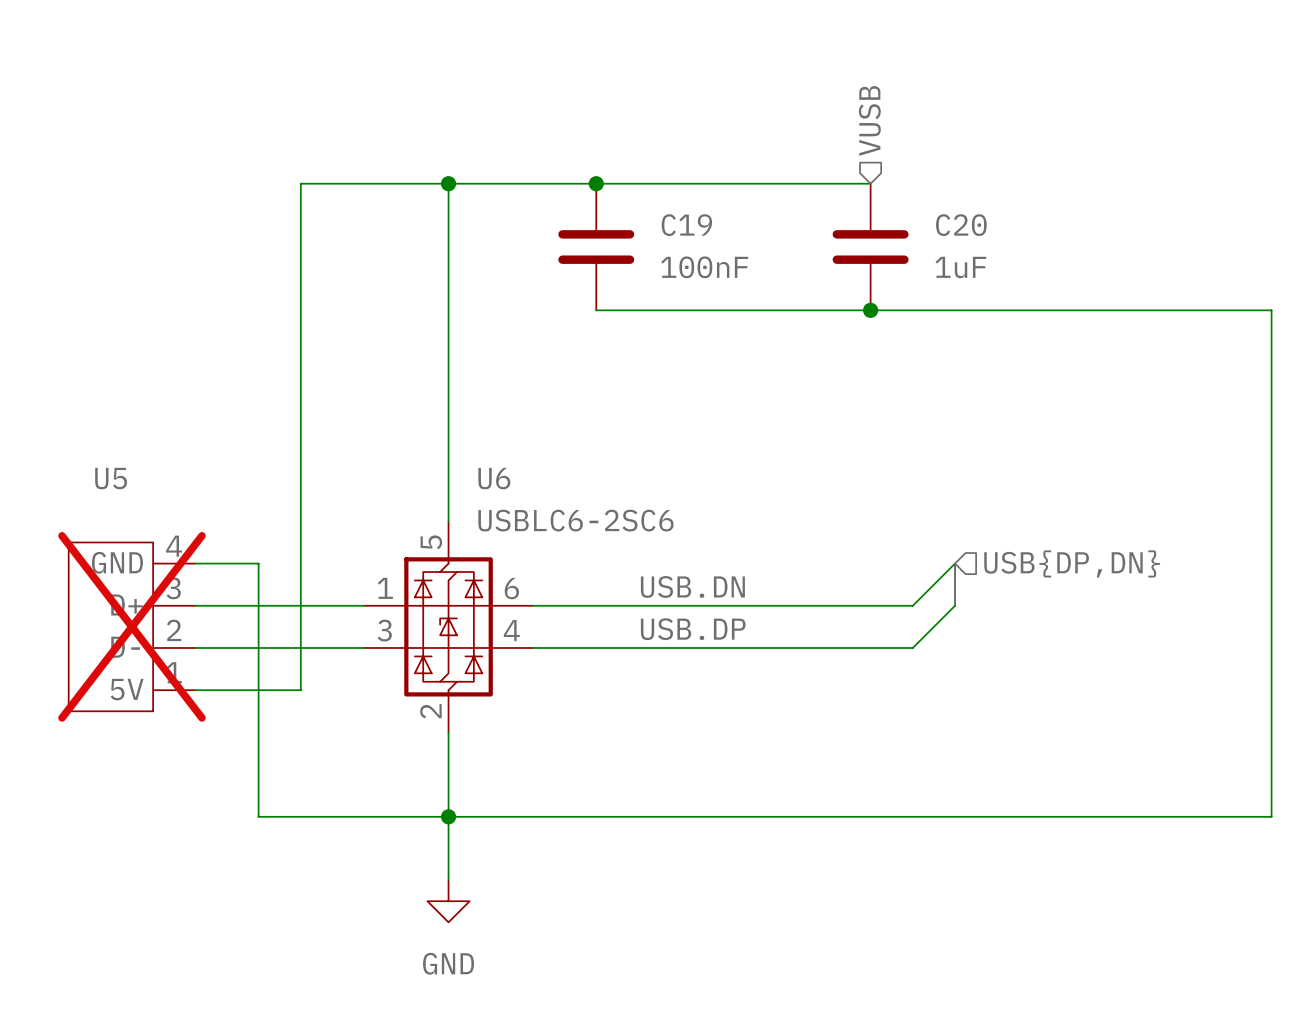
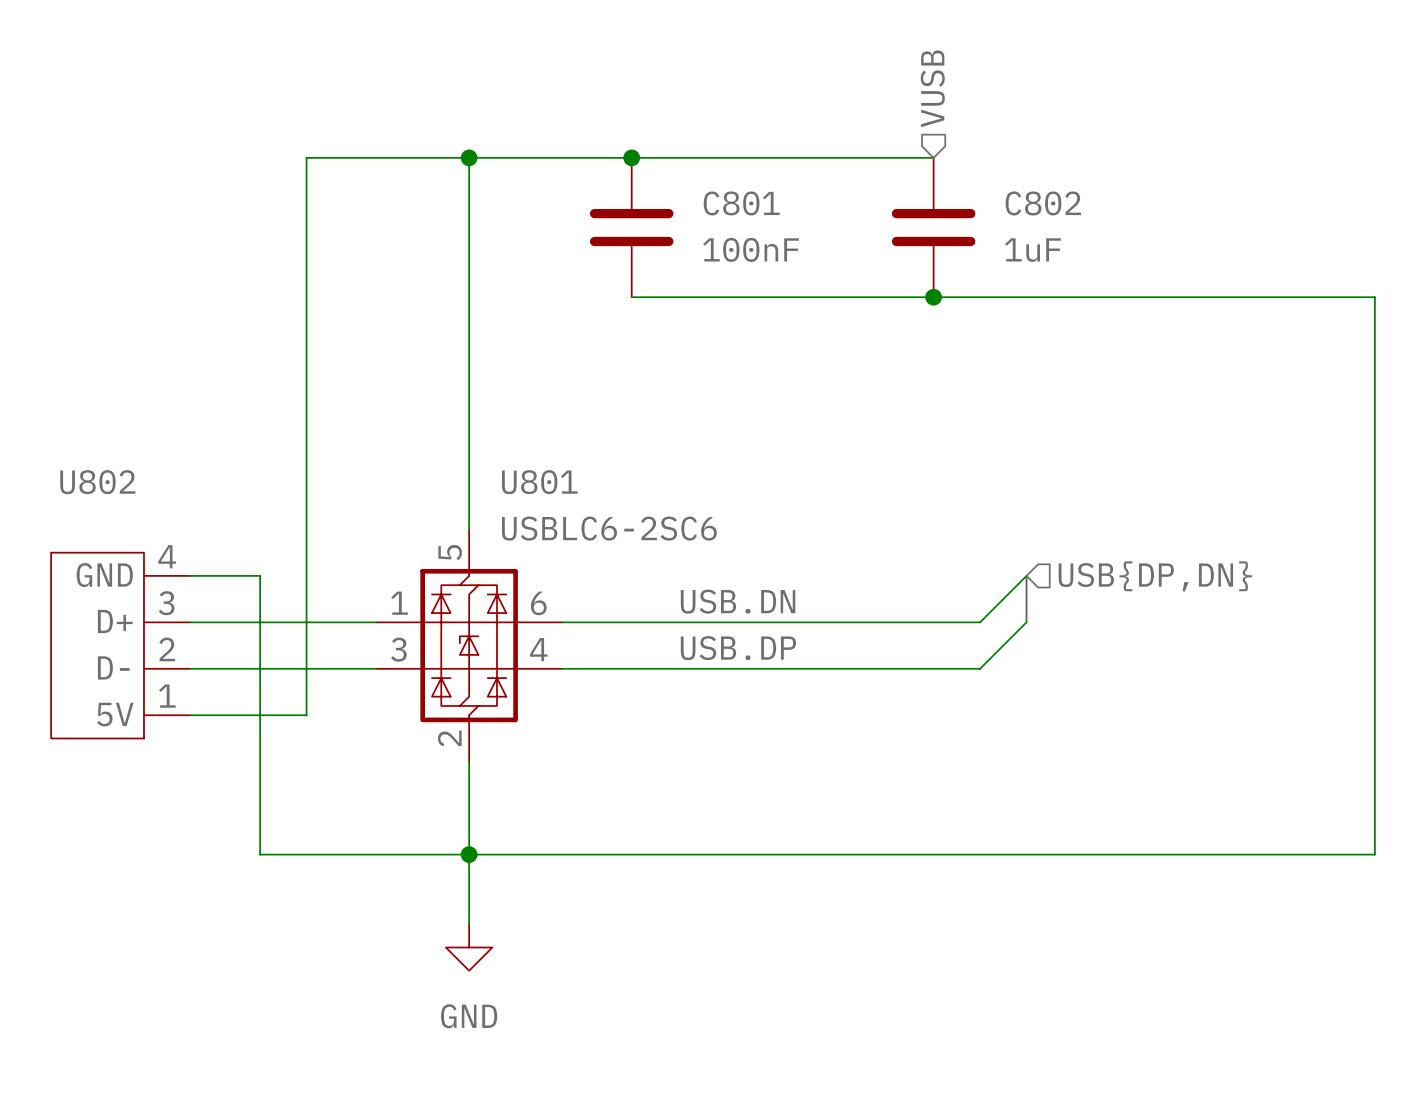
C19 name: C19 (686, 225) -> C801 (741, 203)
C20 name: C20 (961, 225) -> C802 (1043, 203)
U5 name: U5 (111, 478) -> U802 (97, 482)
U6 name: U6 (494, 478) -> U801 (539, 482)
U5 do-not-place cross: (131, 626) -> none

